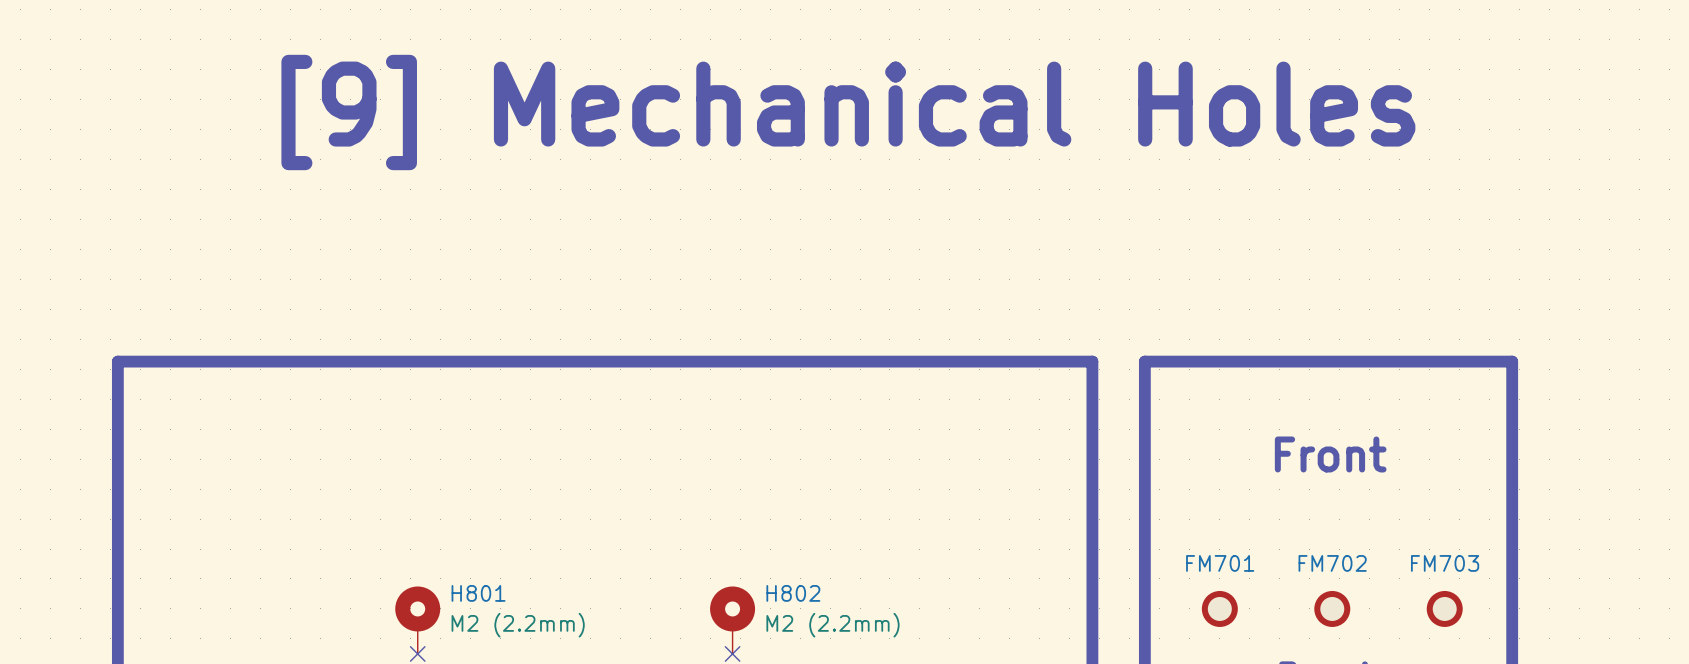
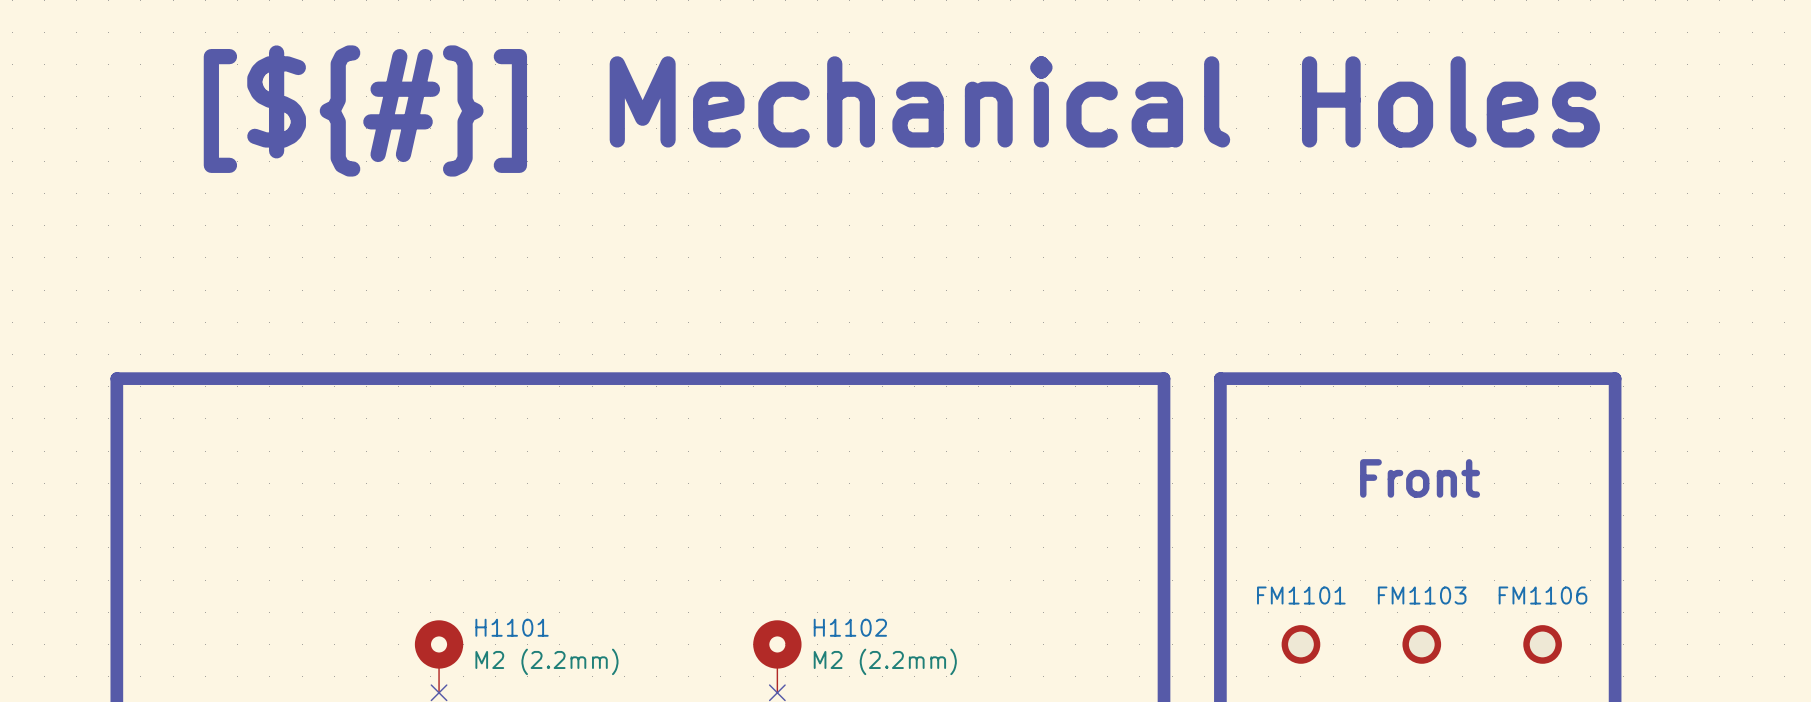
text: [9] Mechanical Holes (848, 112) -> [${#}] Mechanical Holes (901, 110)
FM701 name: FM701 (1220, 563) -> FM1101 (1301, 595)
FM702 name: FM702 (1332, 563) -> FM1103 (1422, 595)
FM703 name: FM703 (1445, 563) -> FM1106 (1542, 595)
H801 name: H801 (478, 593) -> H1101 (512, 627)
H802 name: H802 (793, 593) -> H1102 (850, 627)

